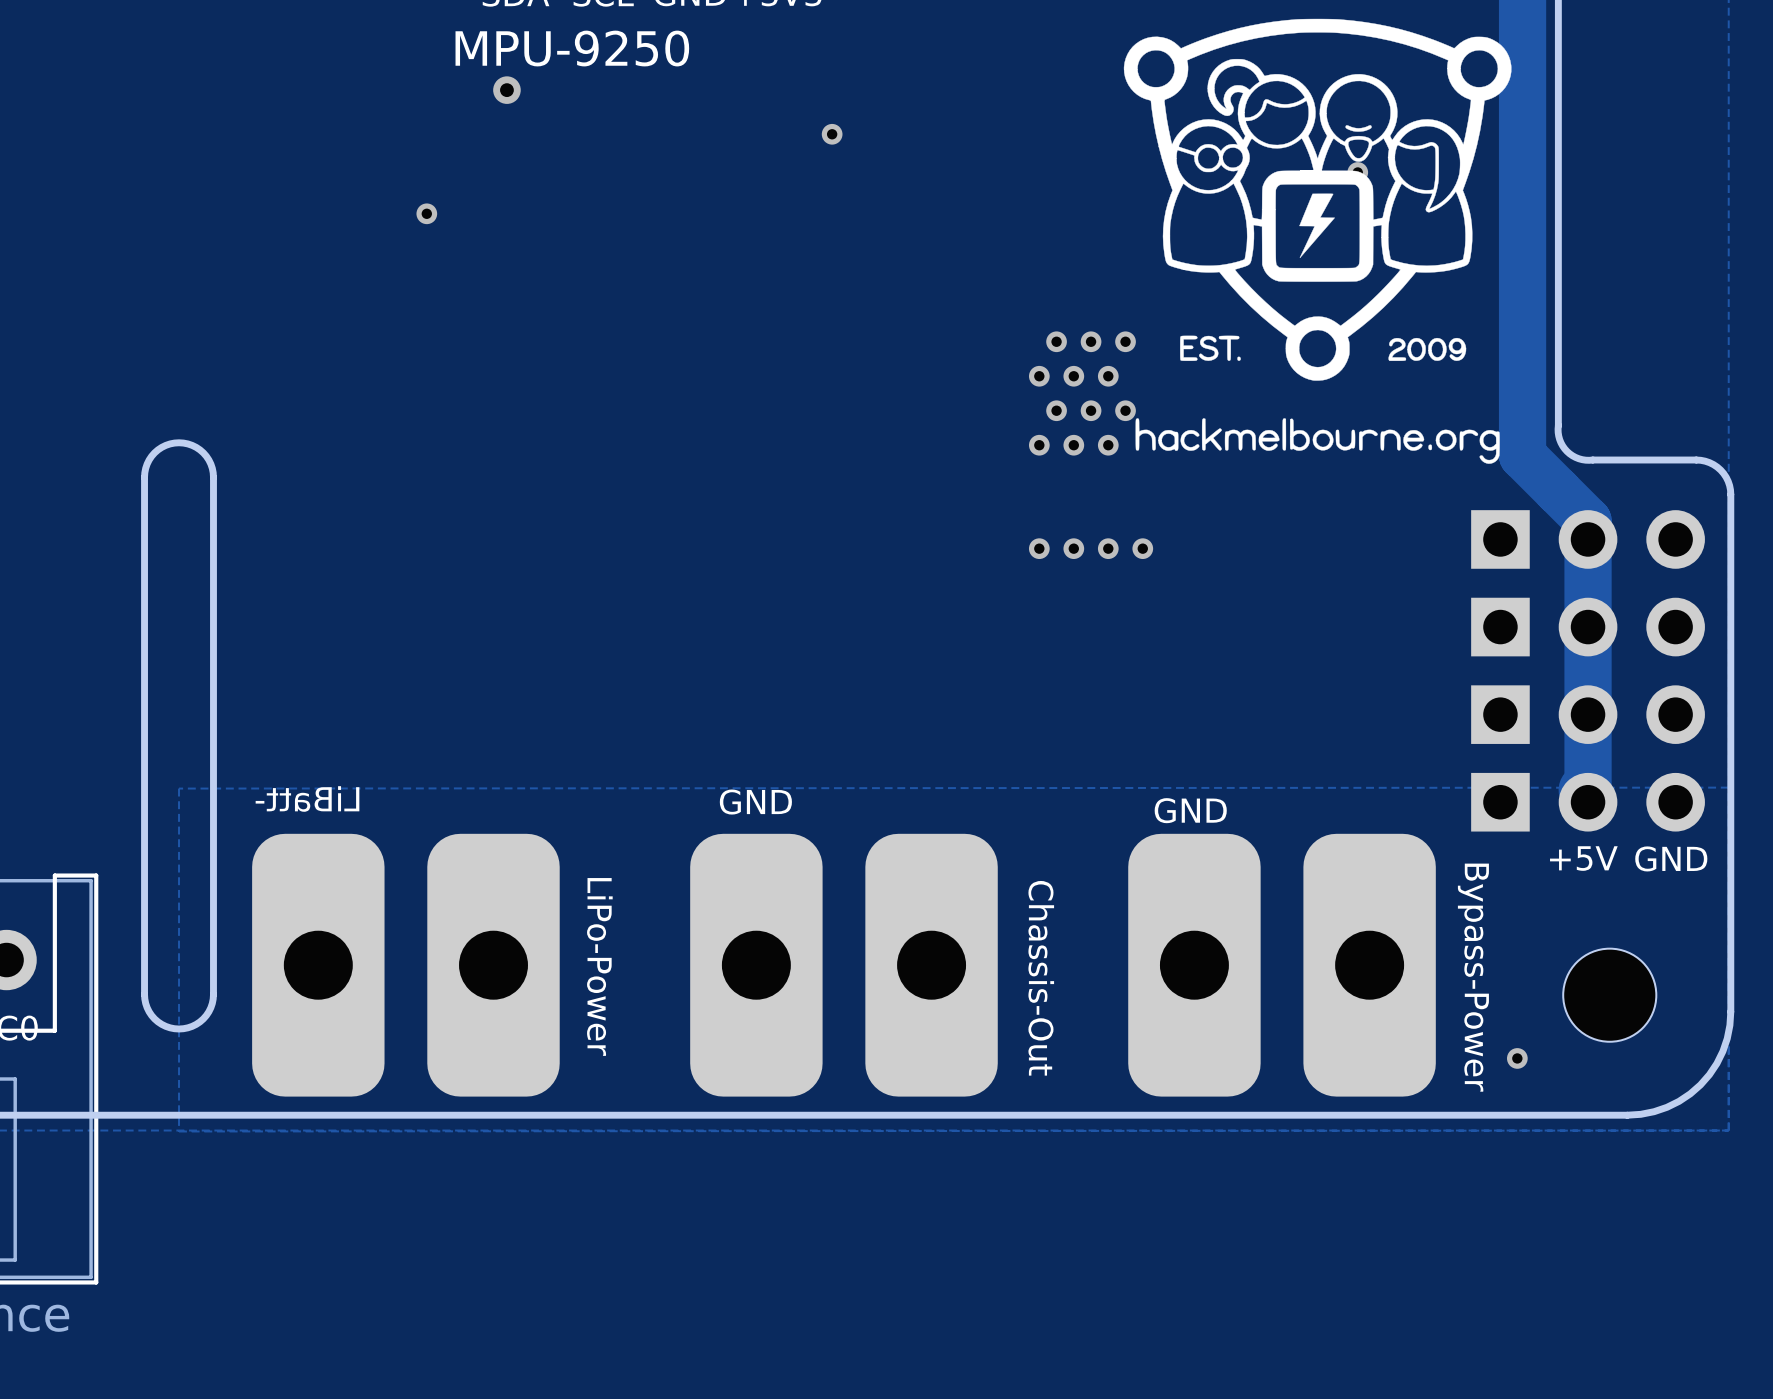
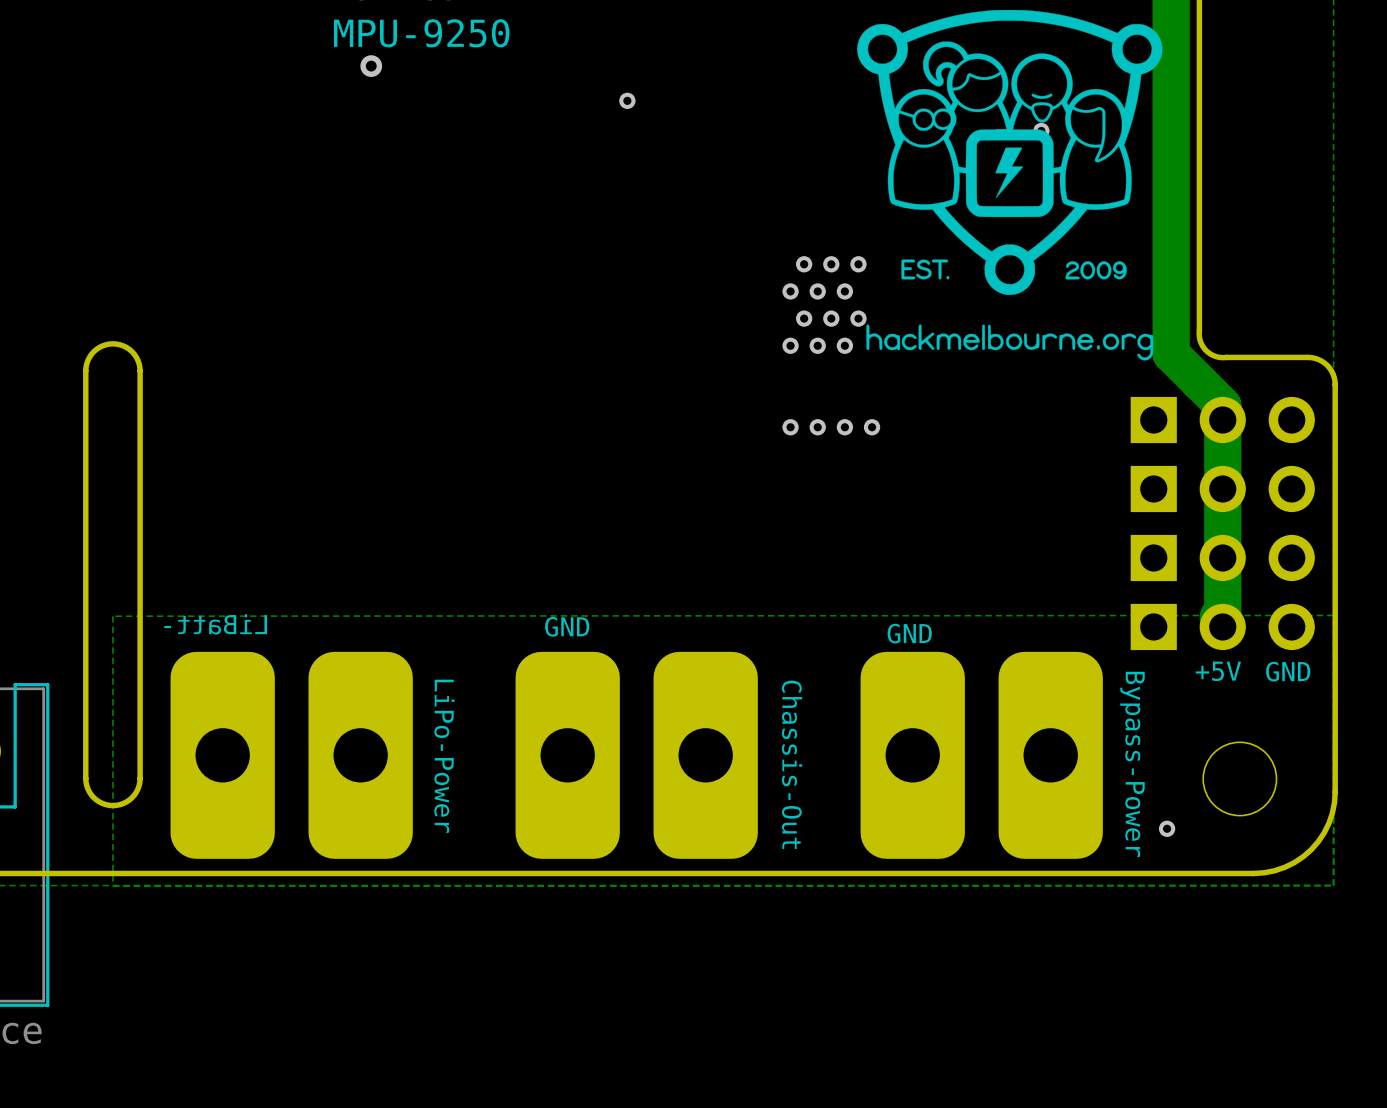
via: (426, 213) -> none

